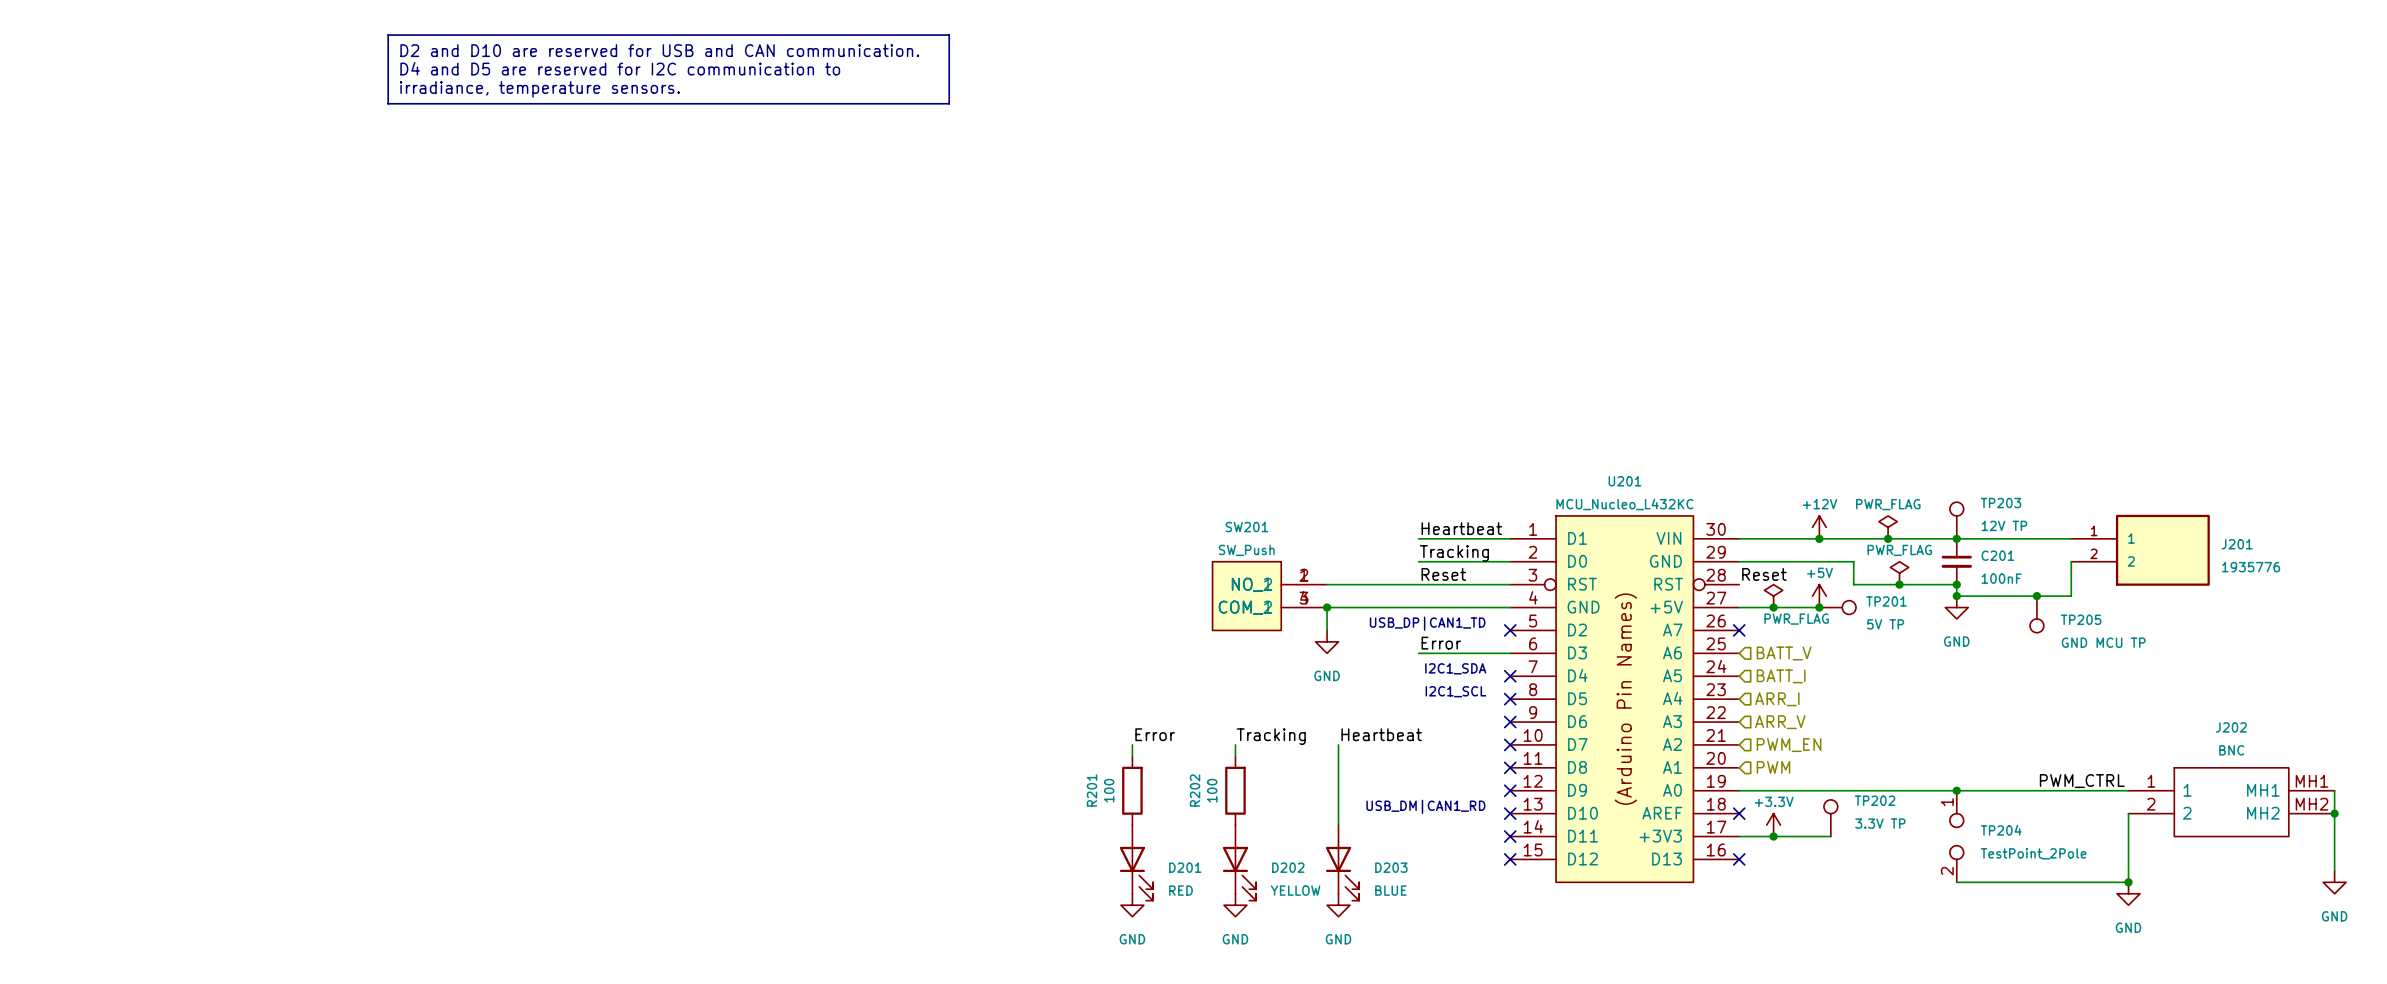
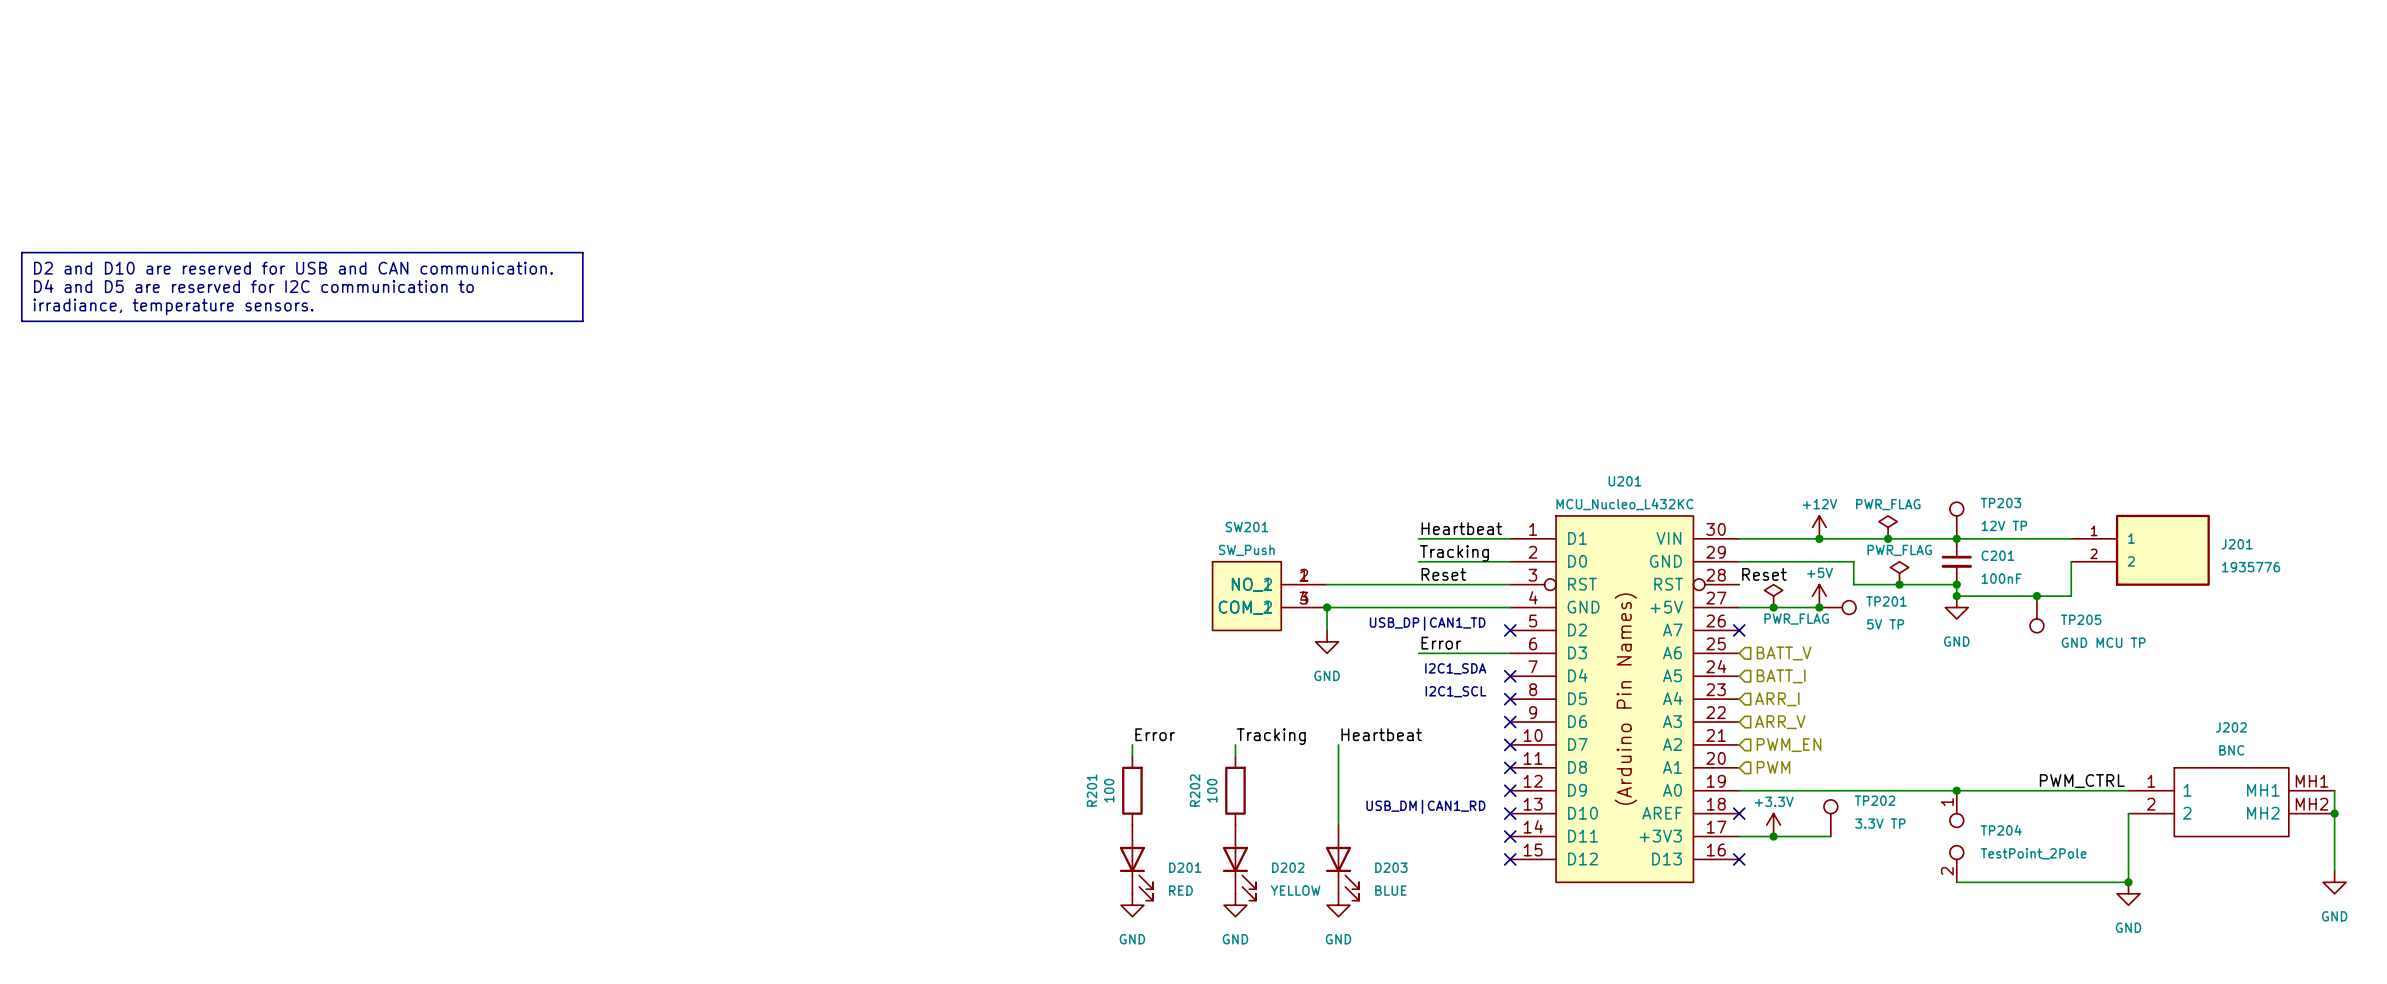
line: (388, 35) (949, 35) (949, 103) (388, 103) (388, 35) -> none
text: D2 and D10 are reserved for USB and CAN communication. (659, 50) -> none
text: D4 and D5 are reserved for I2C communication to (620, 68) -> none
text: irradiance, temperature sensors. (539, 89) -> none
line: none -> (21, 252) (582, 252) (582, 321) (21, 321) (21, 252)
text: none -> D2 and D10 are reserved for USB and CAN communication. (293, 268)
text: none -> D4 and D5 are reserved for I2C communication to (253, 286)
text: none -> irradiance, temperature sensors. (173, 306)

